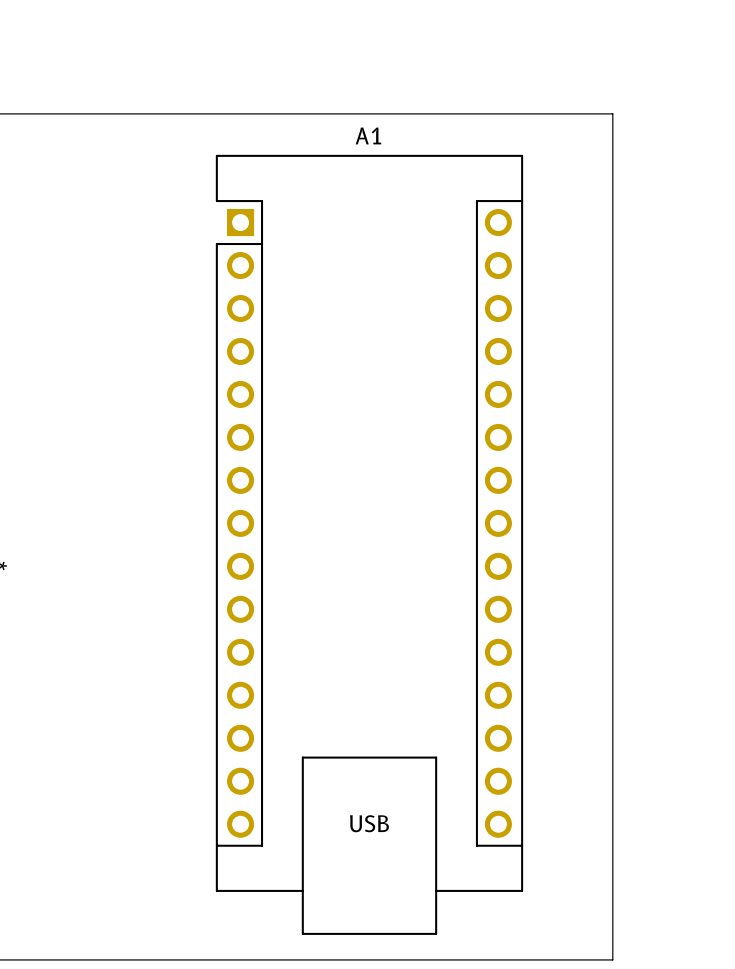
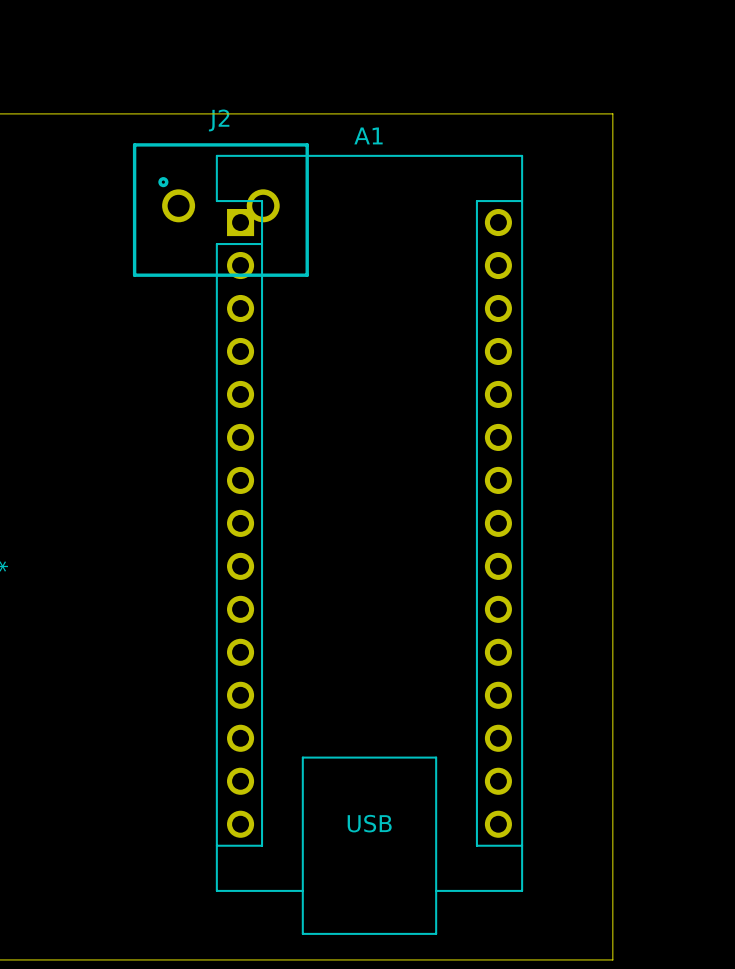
J2: none -> (220, 210)

